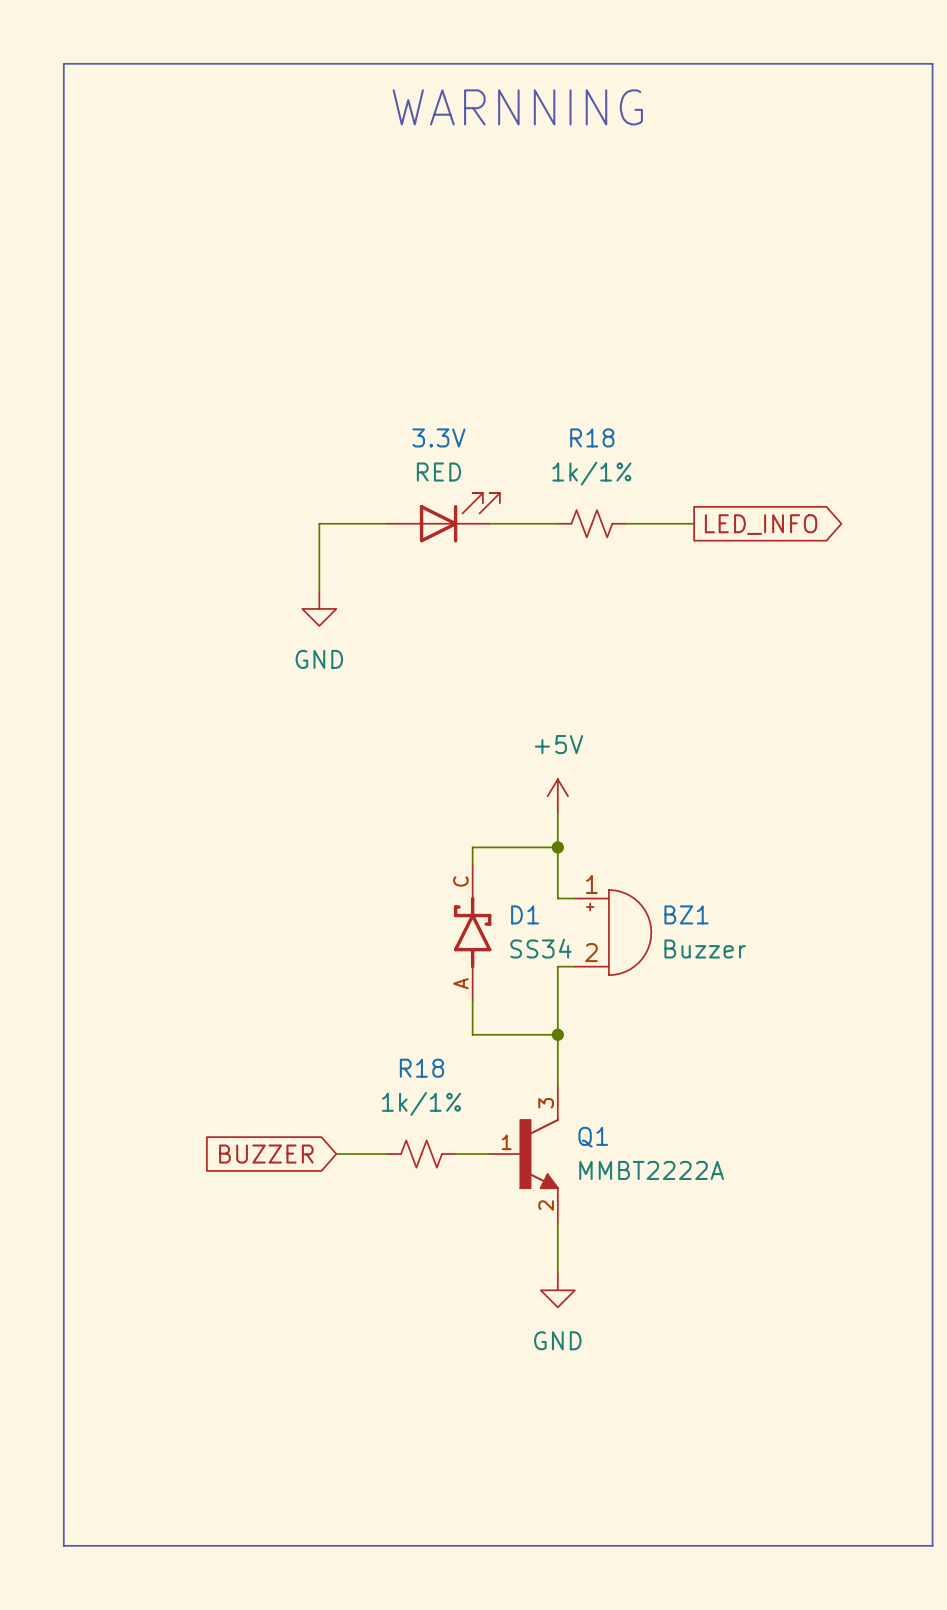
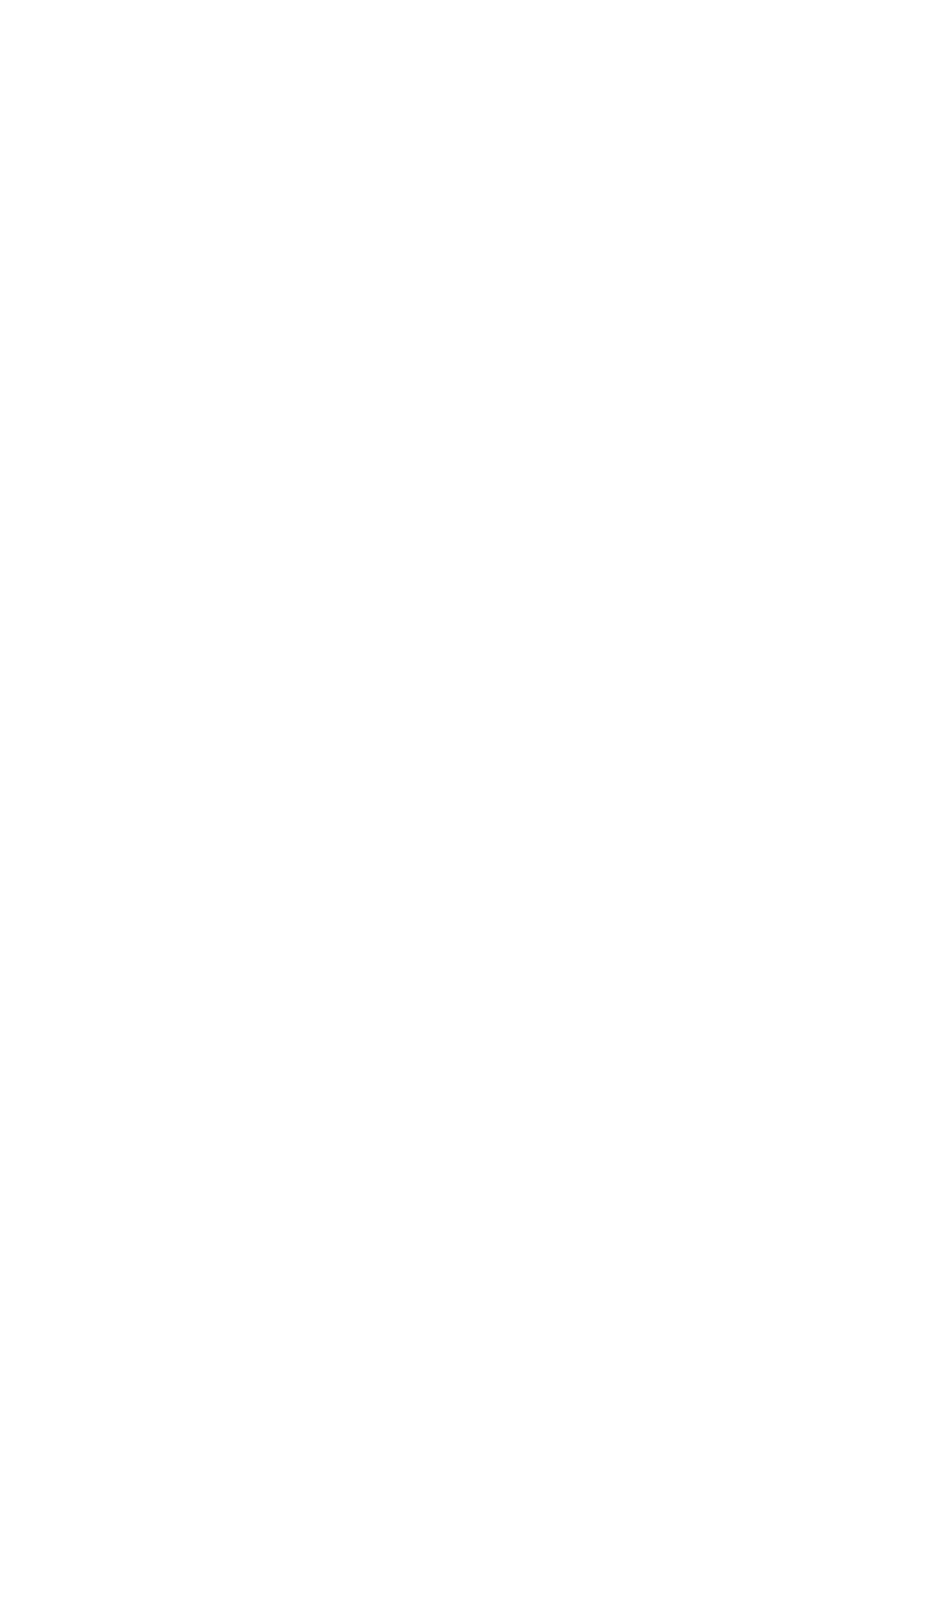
line: (63, 63) (932, 63) (932, 1545) (63, 1545) (63, 63) -> none
text: WARNNING (517, 107) -> none
3.3V: RED (443, 517) -> none
wire: (387, 523) (319, 523) (319, 591) -> none
wire: (489, 523) (557, 523) -> none
R18: 1k/1% (591, 523) -> none
wire: (625, 523) (694, 523) -> none
global label: LED_INFO (761, 524) -> none
power symbol: GND (319, 608) -> none
power symbol: +5V (557, 796) -> none
wire: (557, 813) (557, 898) (574, 898) -> none
wire: (557, 847) (472, 847) (472, 864) -> none
junction: (557, 847) -> none
D1: SS34 (472, 932) -> none
BZ1: Buzzer (613, 932) -> none
wire: (574, 966) (557, 966) (557, 1085) -> none
wire: (472, 1000) (472, 1034) (557, 1034) -> none
junction: (557, 1034) -> none
global label: BUZZER (266, 1154) -> none
wire: (336, 1154) (387, 1154) -> none
R18: 1k/1% (421, 1154) -> none
wire: (455, 1154) (489, 1154) -> none
Q1: MMBT2222A (524, 1154) -> none
wire: (557, 1222) (557, 1273) -> none
power symbol: GND (557, 1290) -> none

